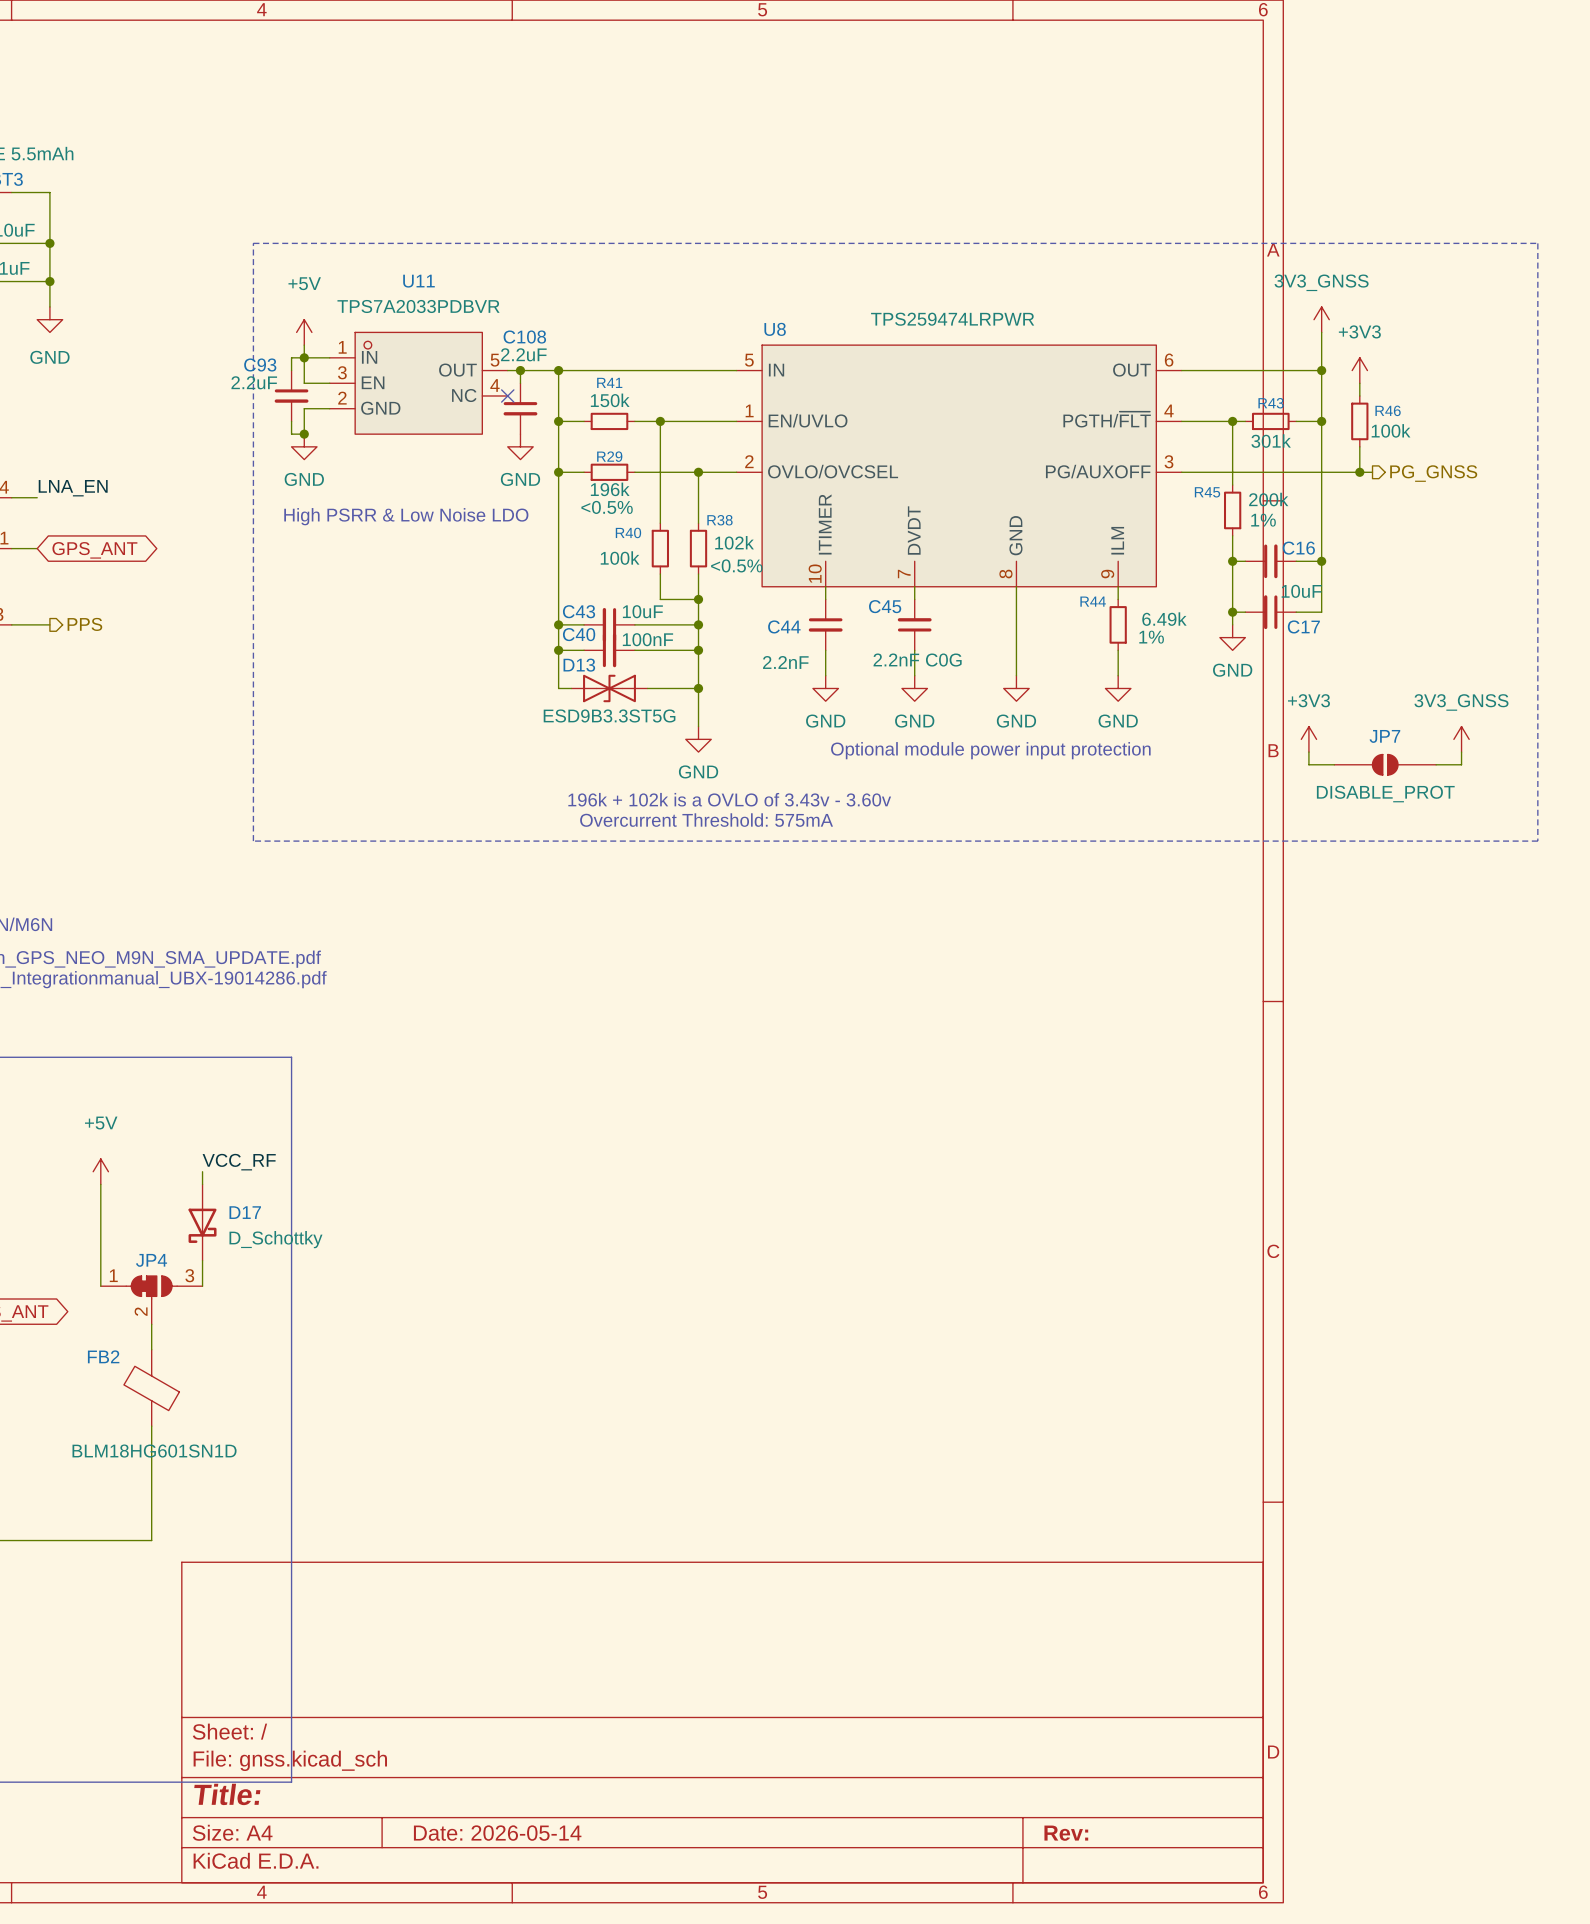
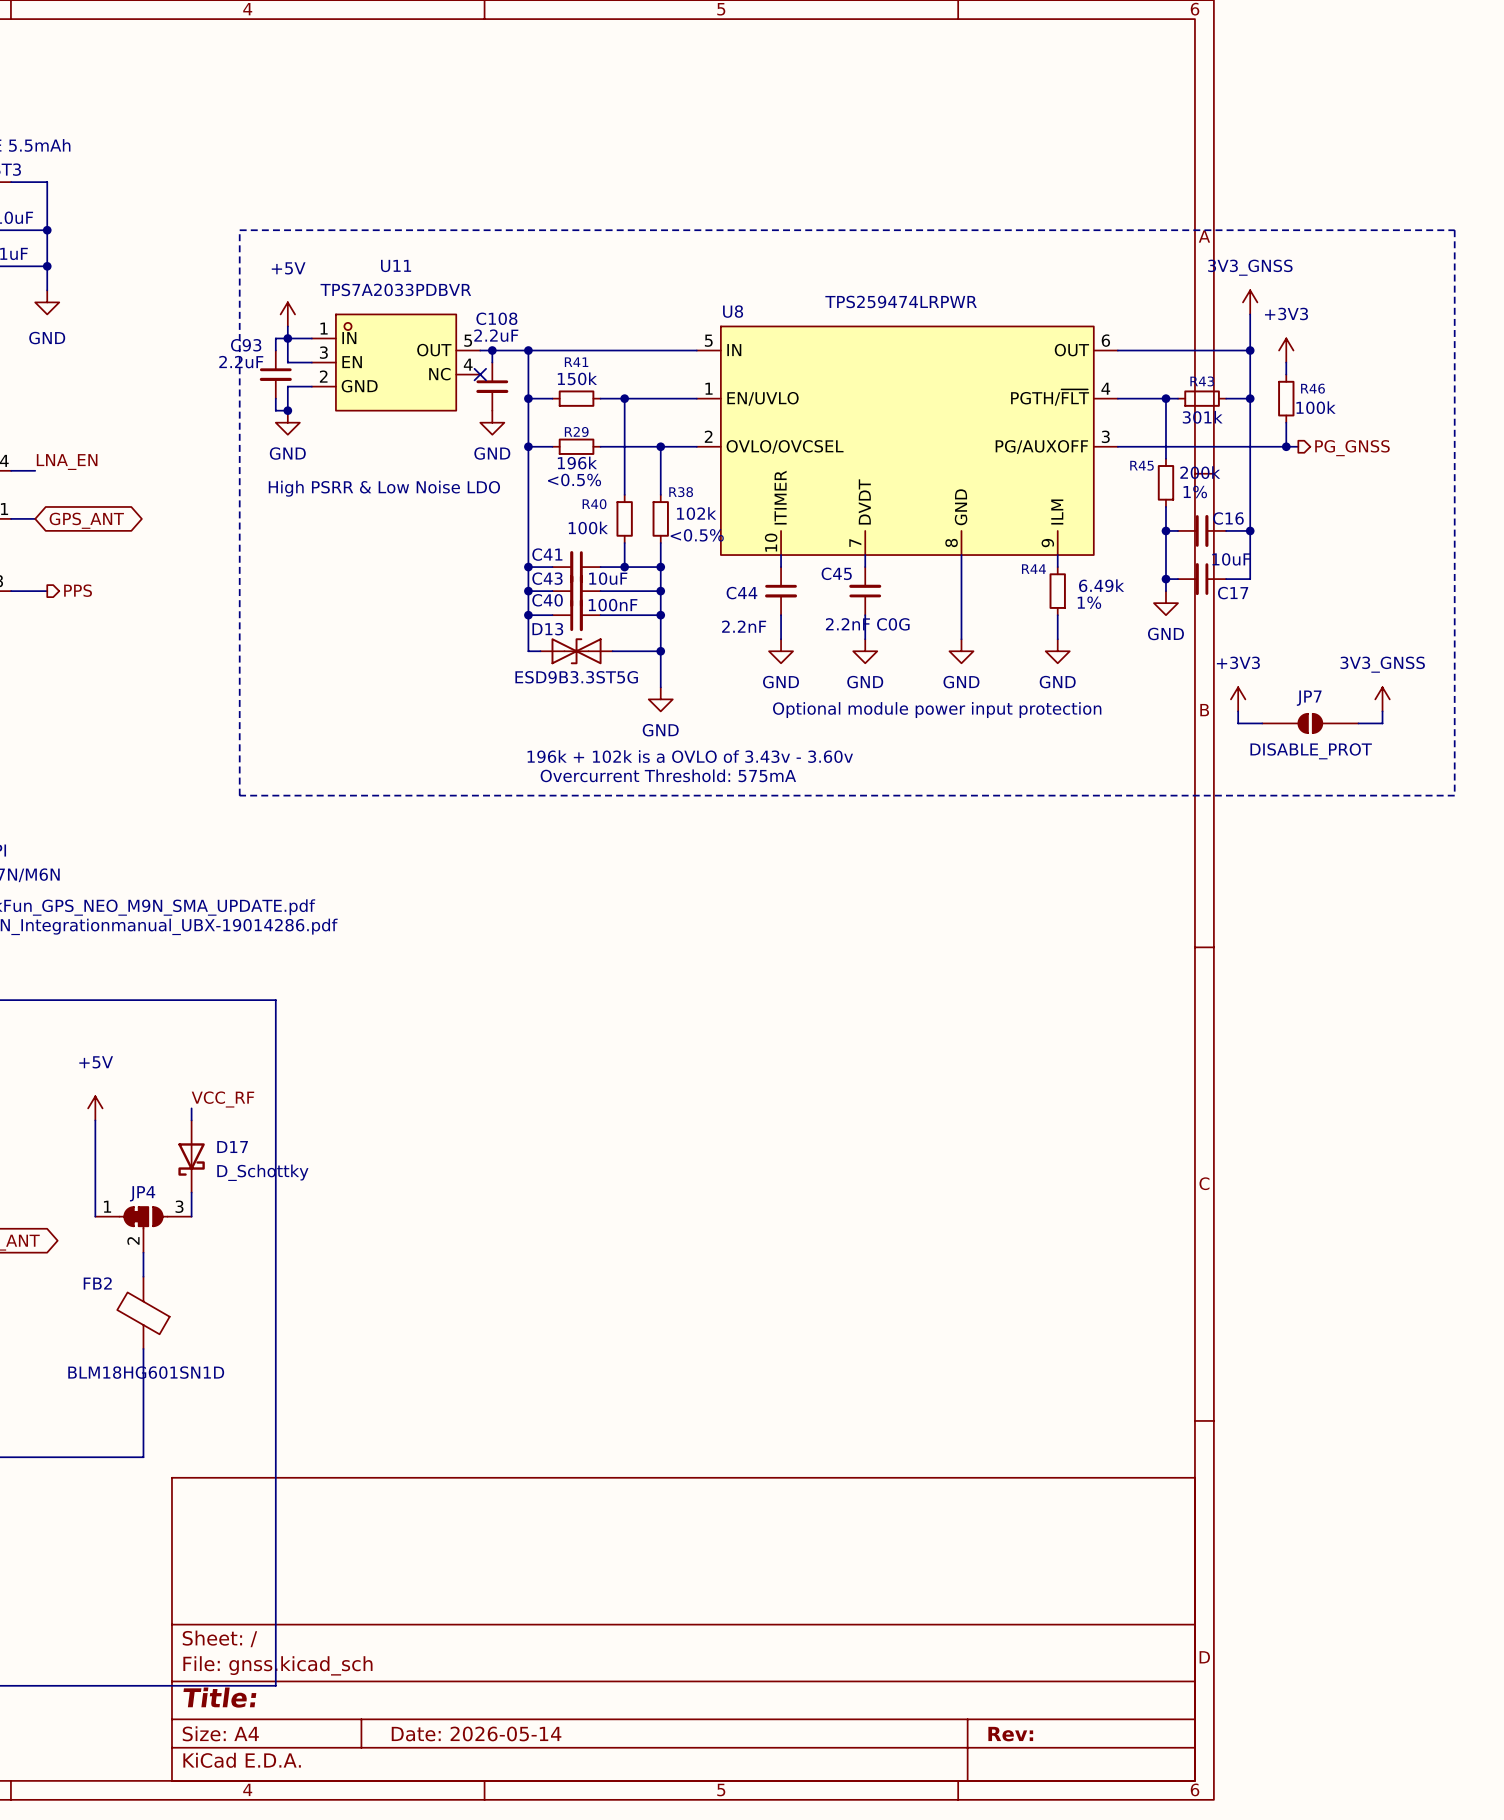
wire: none -> (528, 567) (552, 567)
junction: none -> (528, 567)
C41: none -> (576, 567)
wire: none -> (600, 567) (624, 567)
junction: none -> (624, 567)

